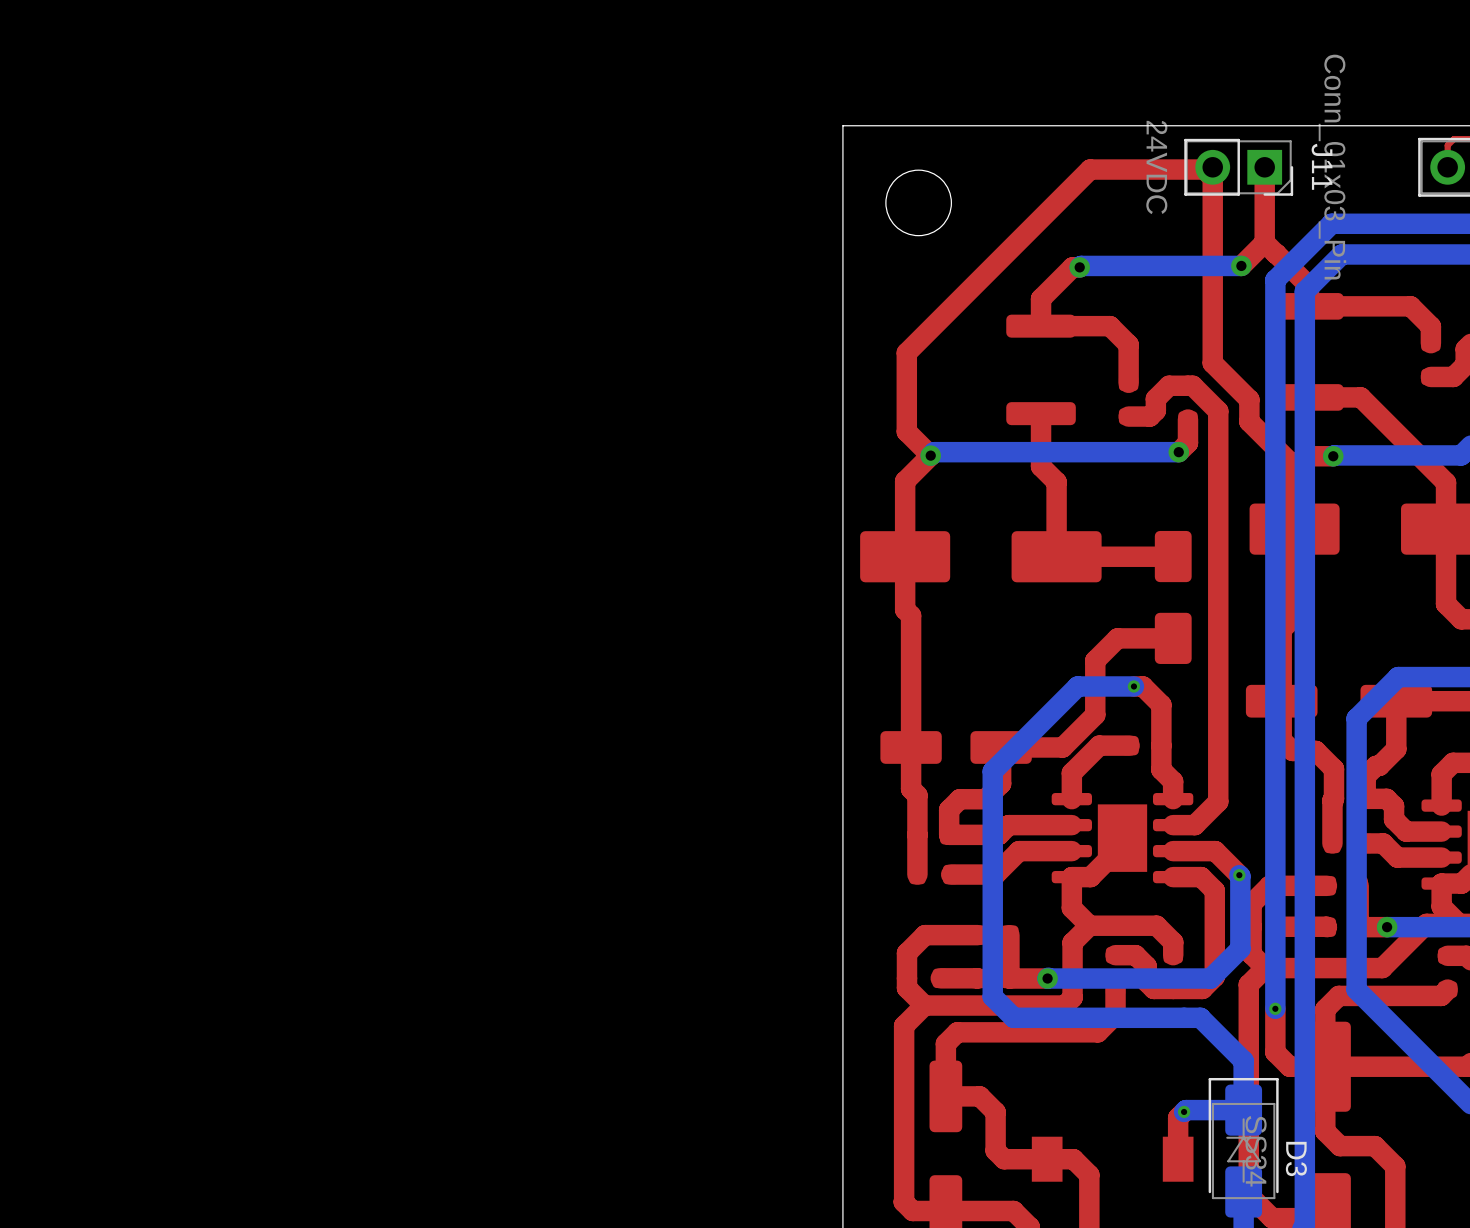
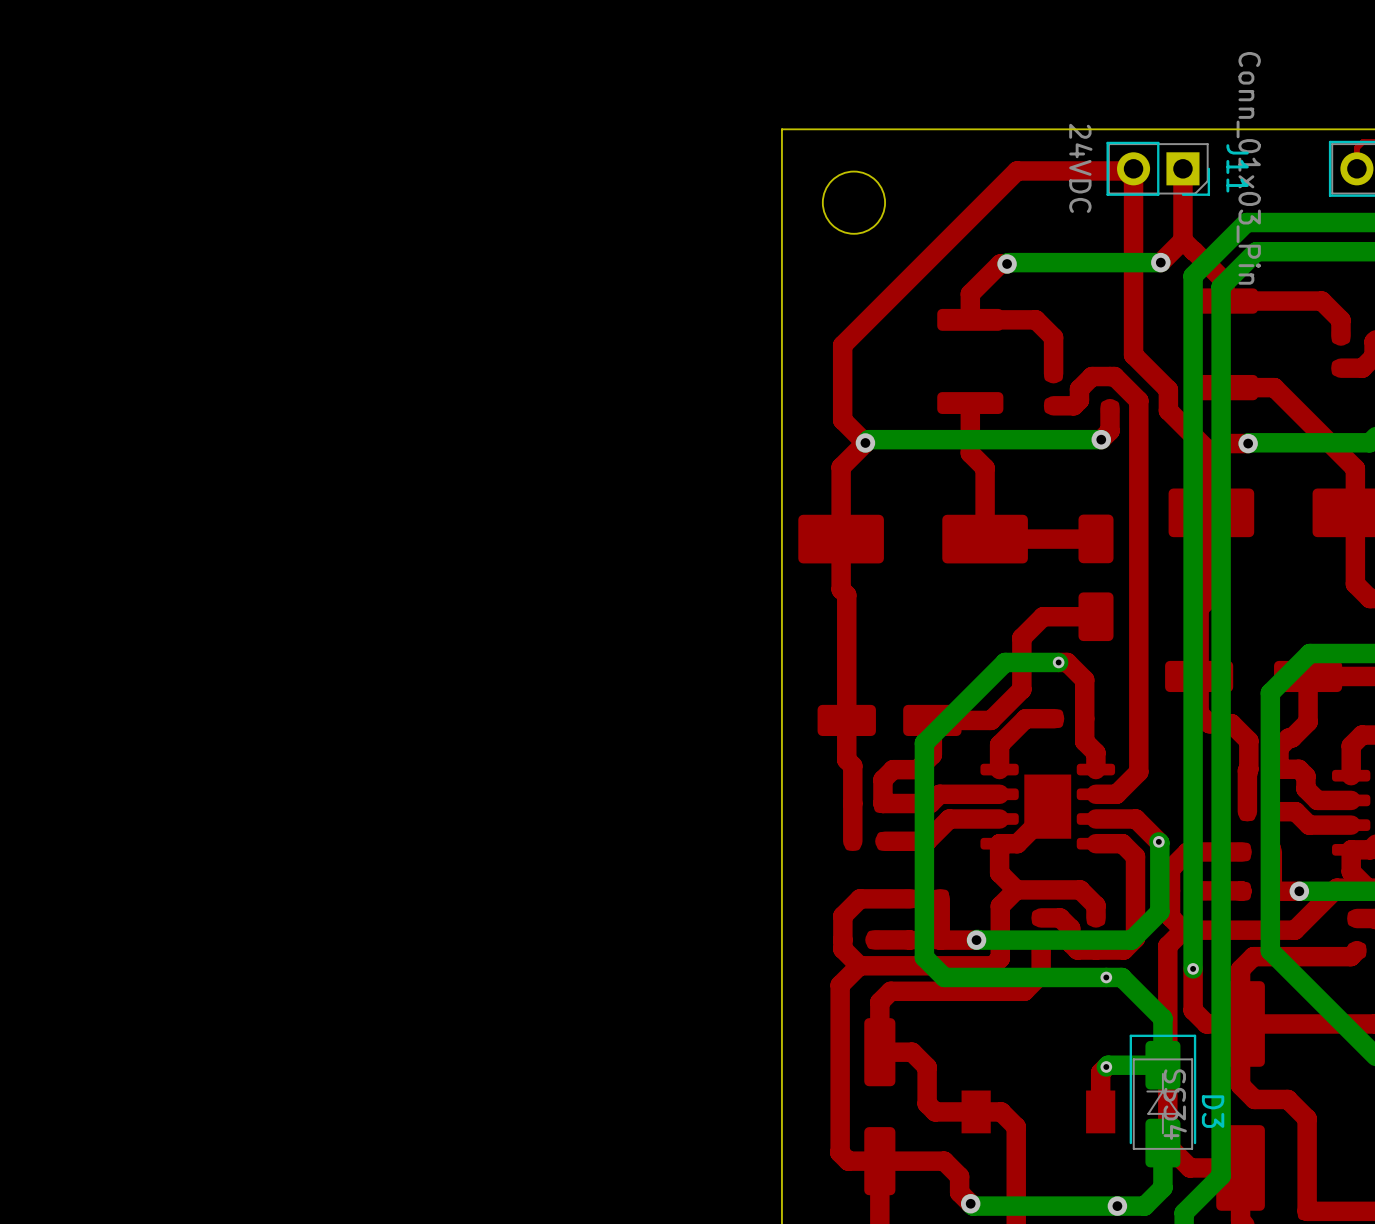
via: none -> (1106, 977)

